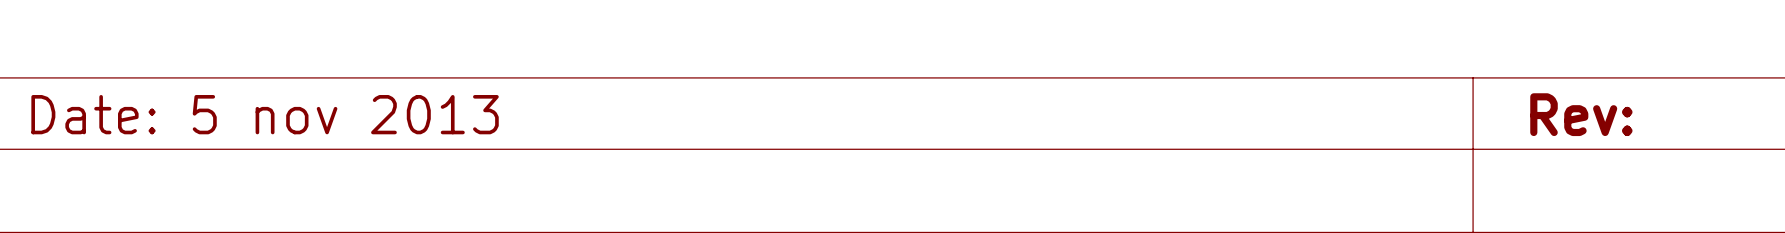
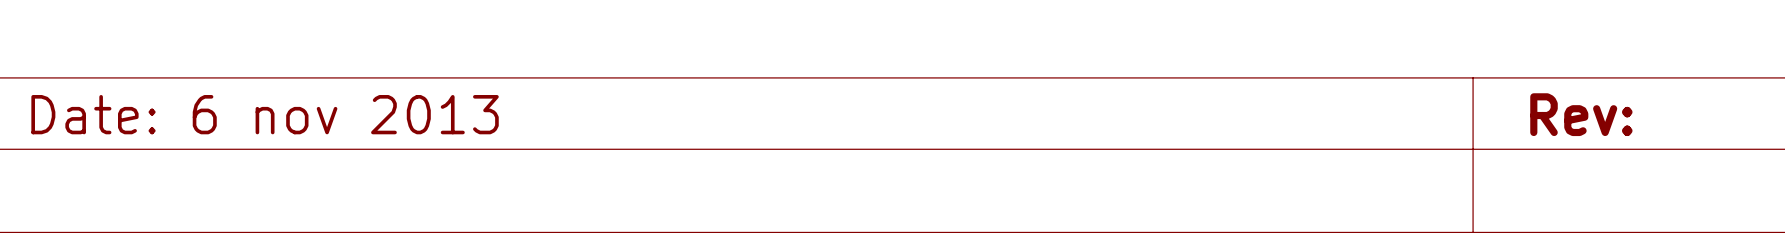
title block: Date: 5 nov 2013 (265, 114) -> Date: 6 nov 2013 (265, 114)

